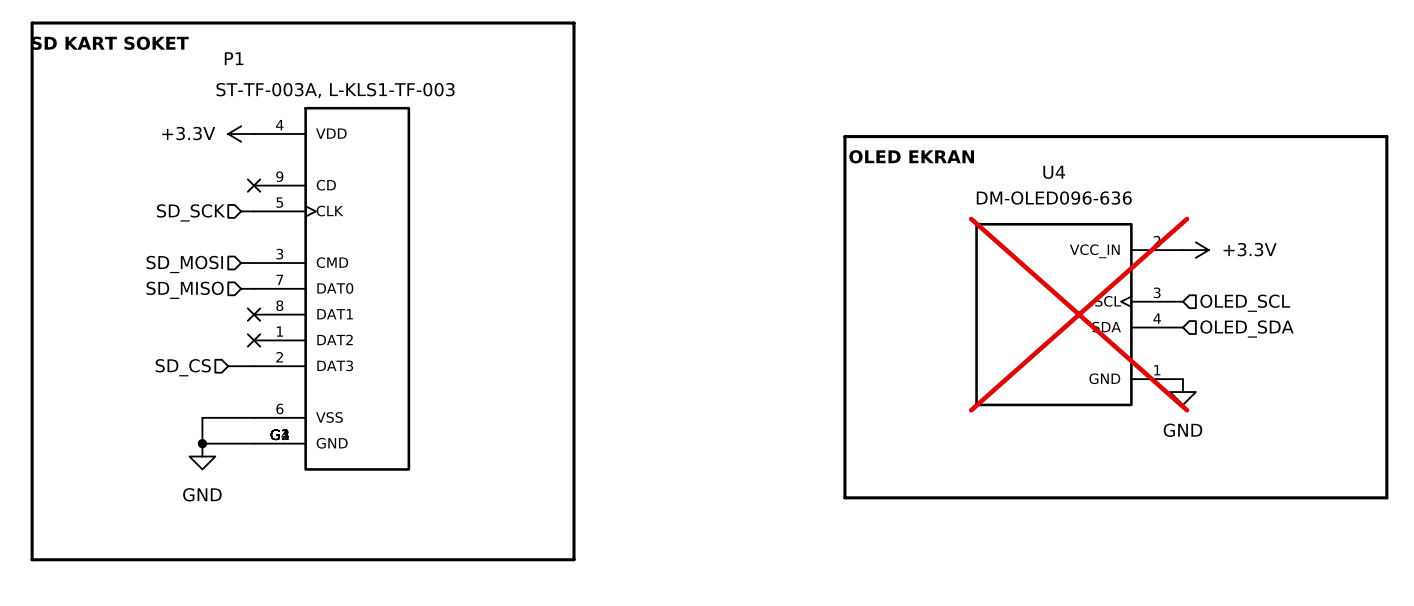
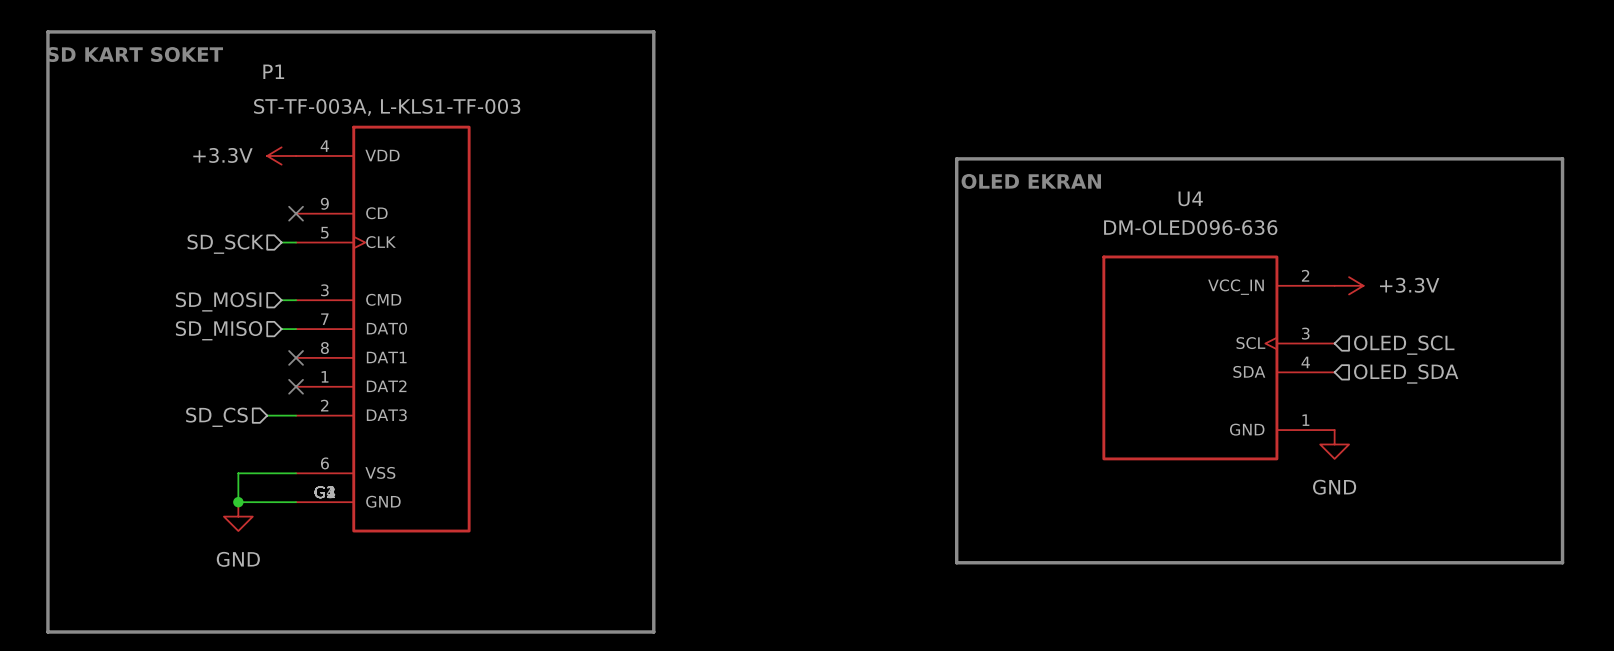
U4 do-not-place cross: (1079, 314) -> none

